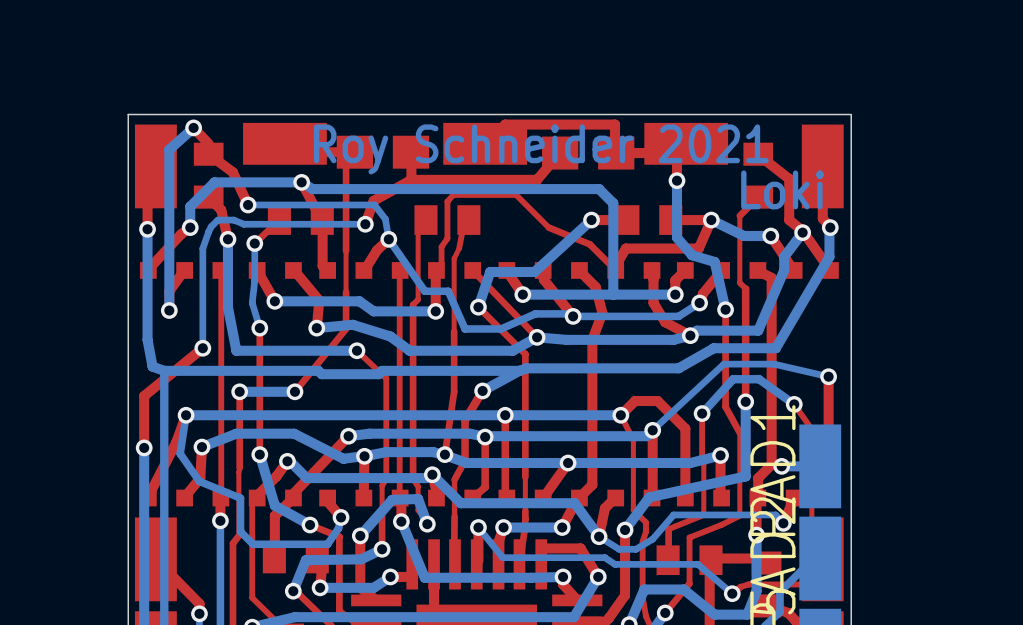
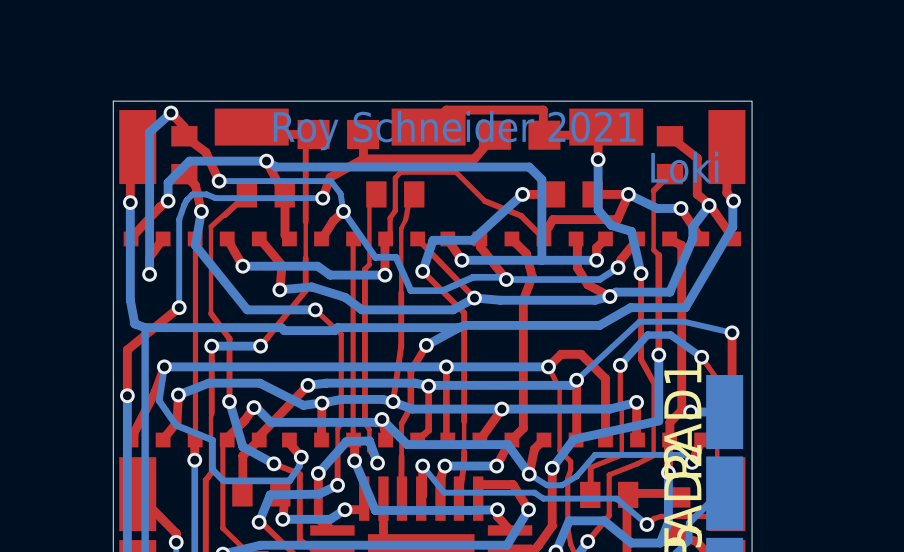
bottom track: (227, 239) (227, 307) (236, 350) (279, 350) -> (201, 211) (195, 245) (247, 309)
bottom track: (254, 243) (254, 280) (252, 303) (259, 328) -> none
via: (254, 243) -> none
top track: (259, 328) (259, 383) -> (246, 194) (211, 226) (211, 313) (229, 338)
via: (259, 328) -> none

